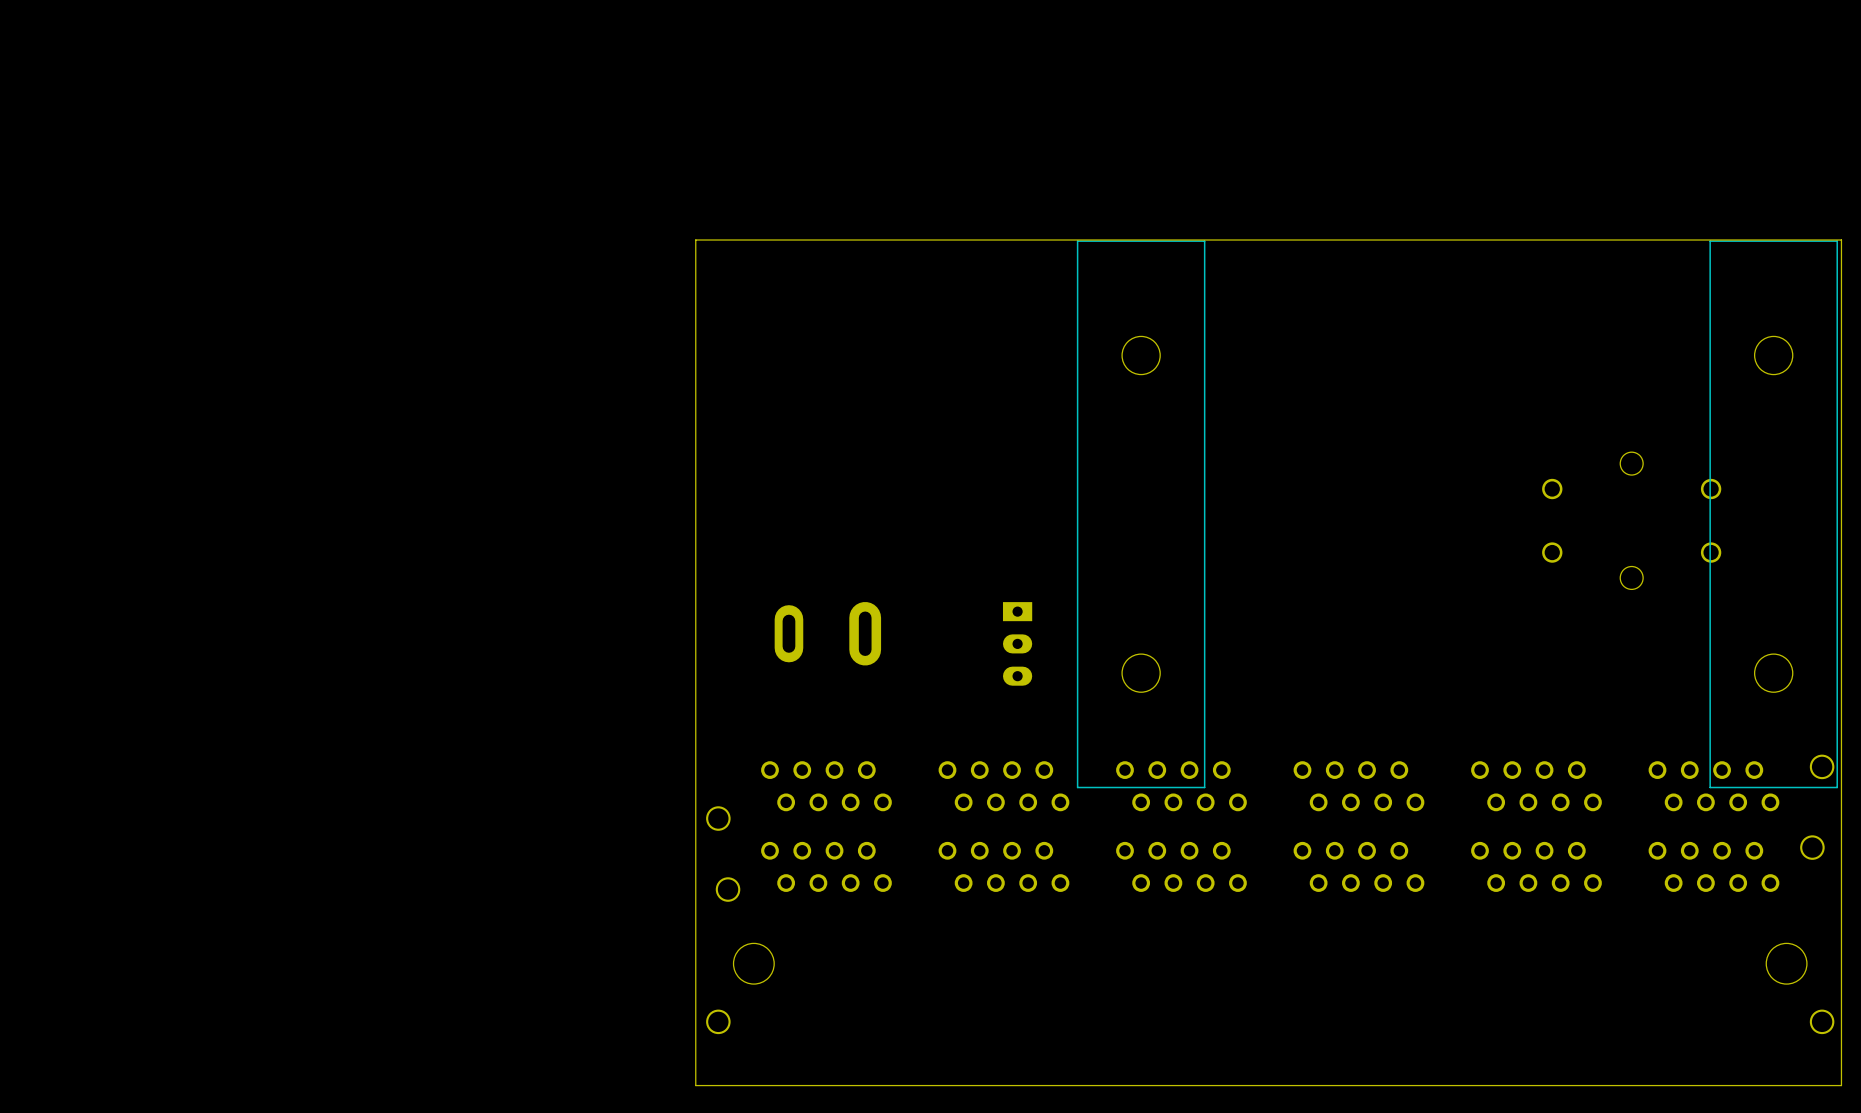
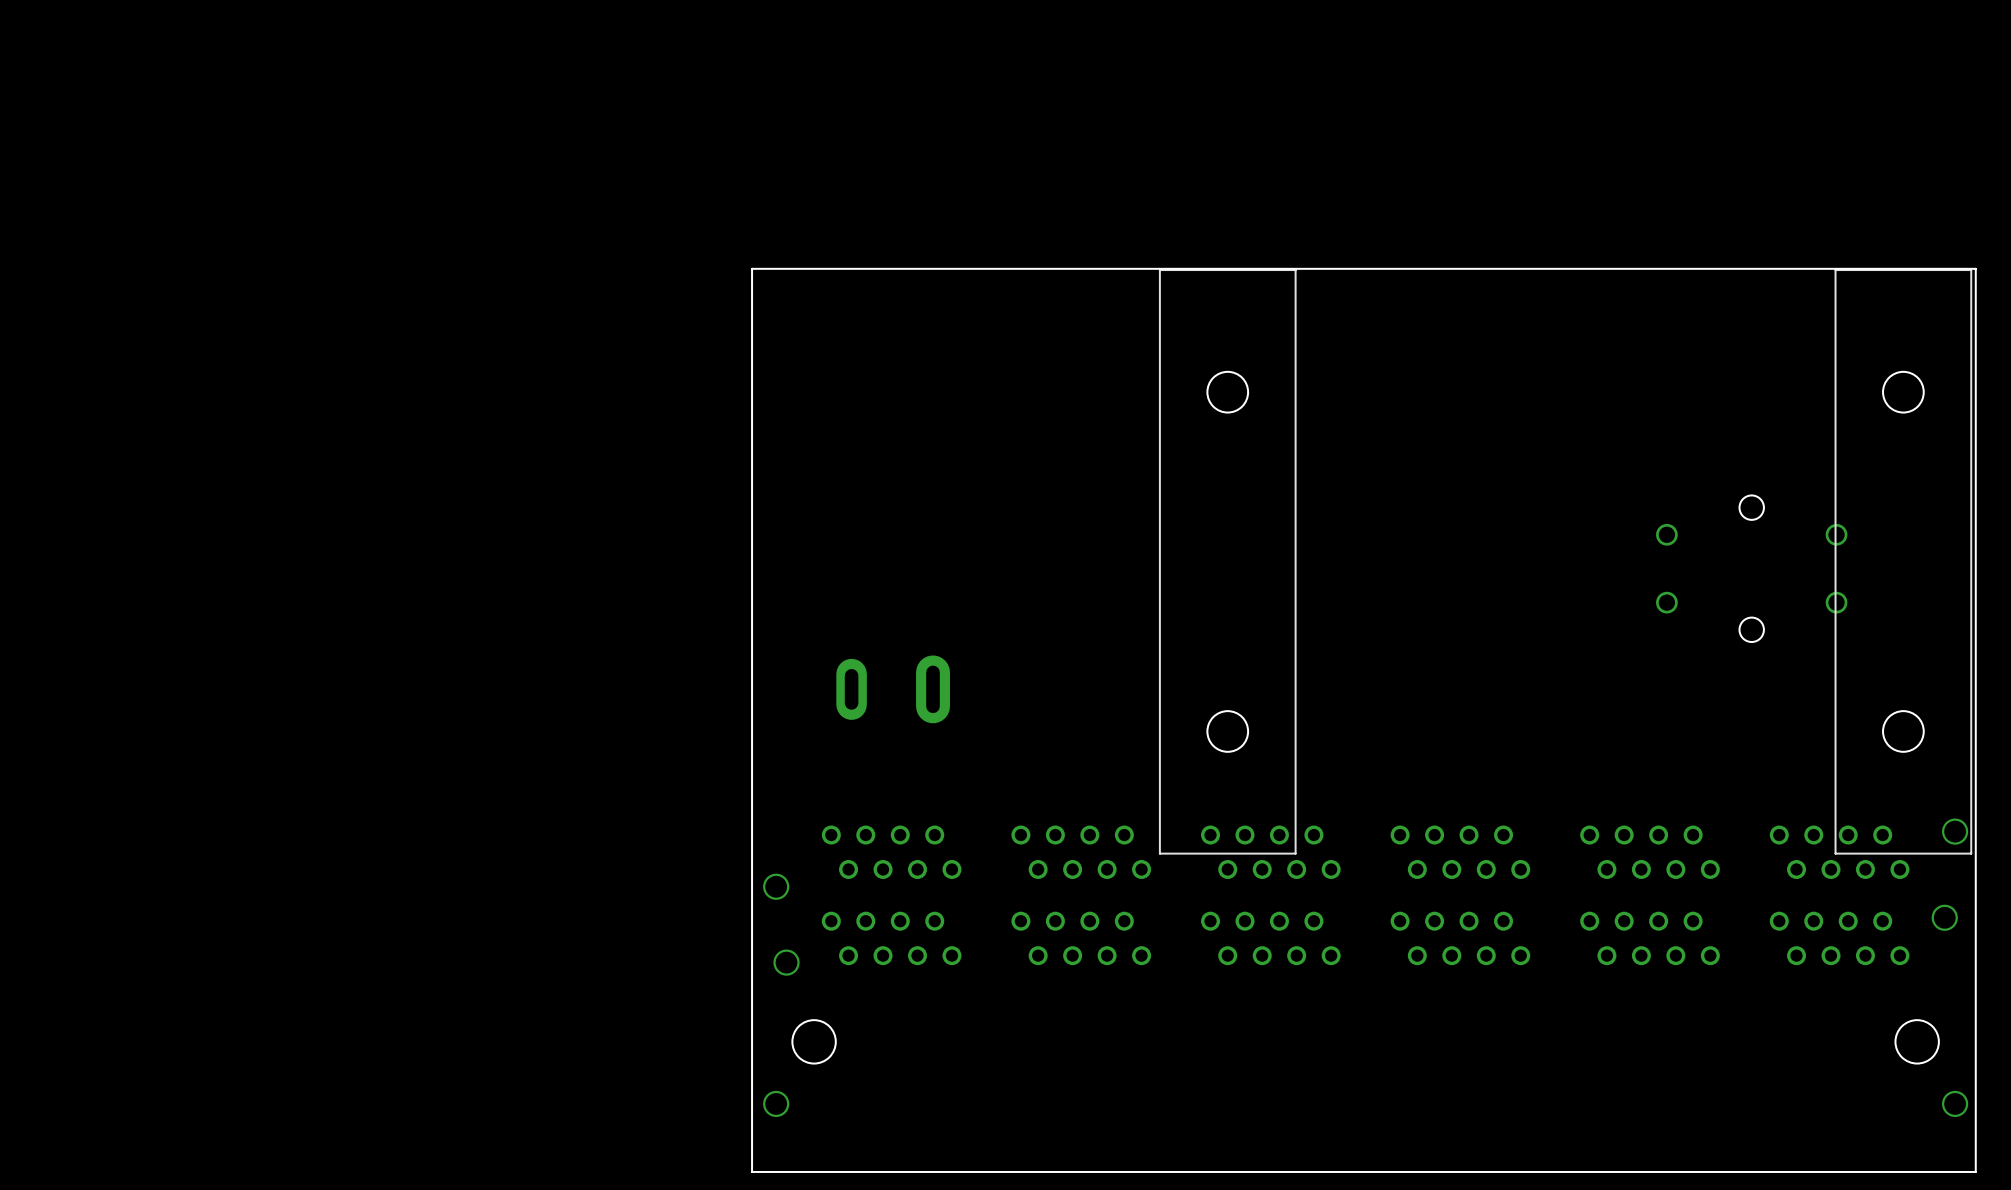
part: (1017, 643) -> none

